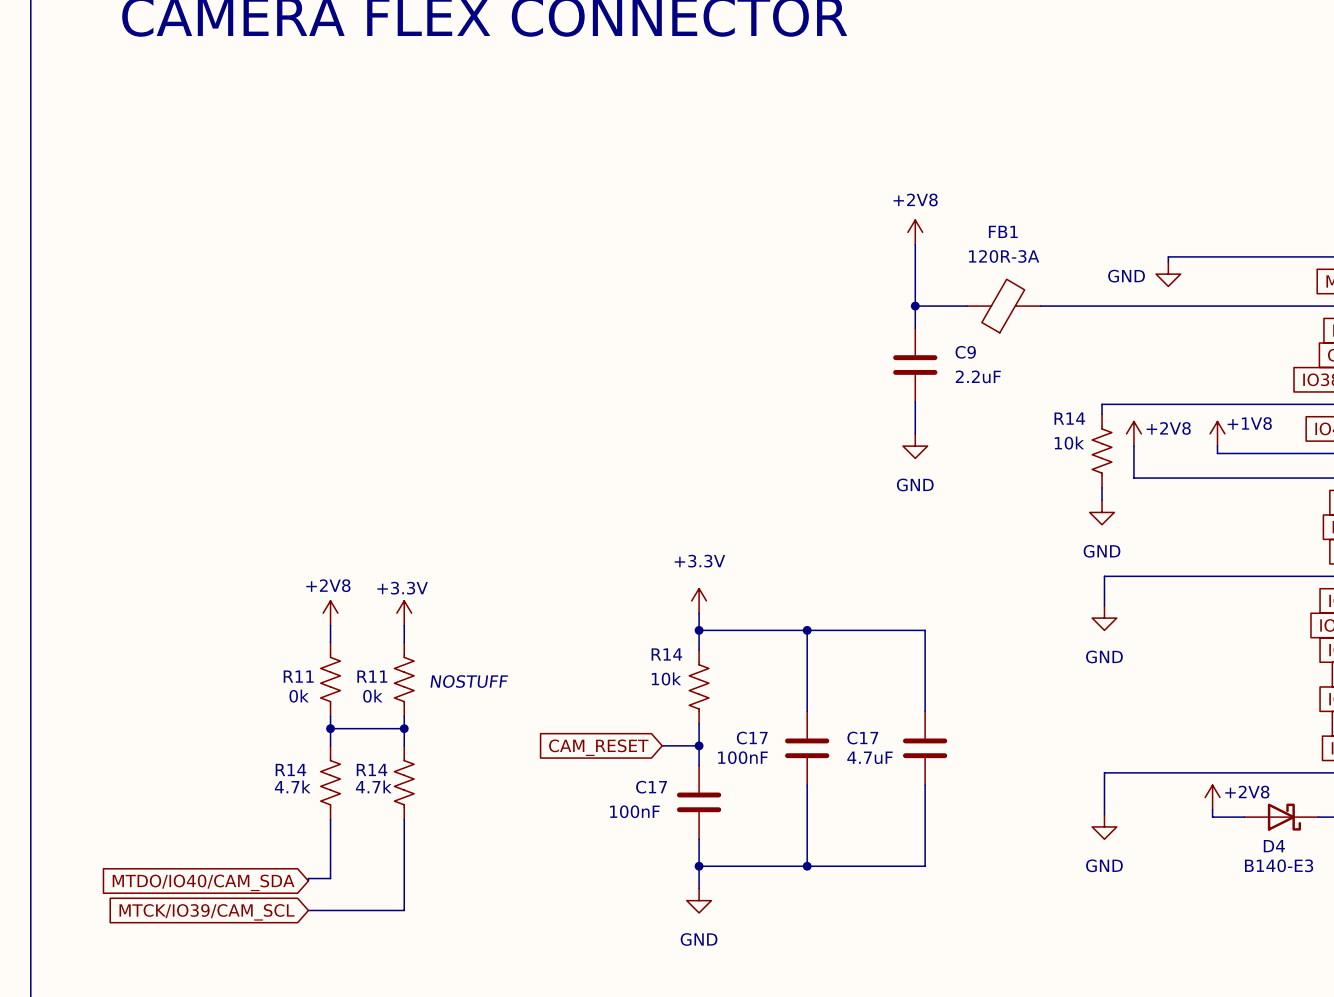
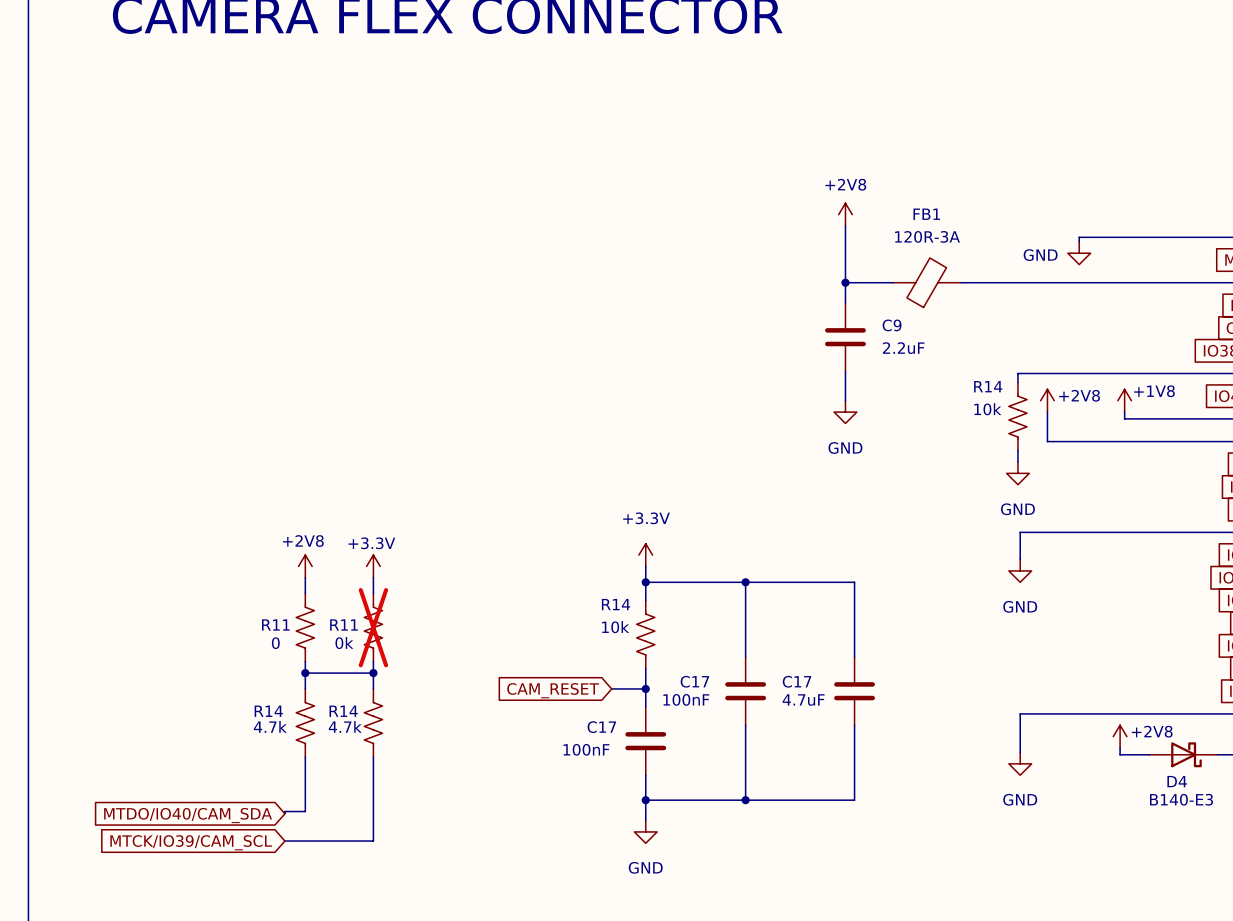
R11 do-not-place cross: none -> (373, 627)
R11 text: NOSTUFF (469, 681) -> none
R11 value: 0k (299, 696) -> 0 (275, 643)

